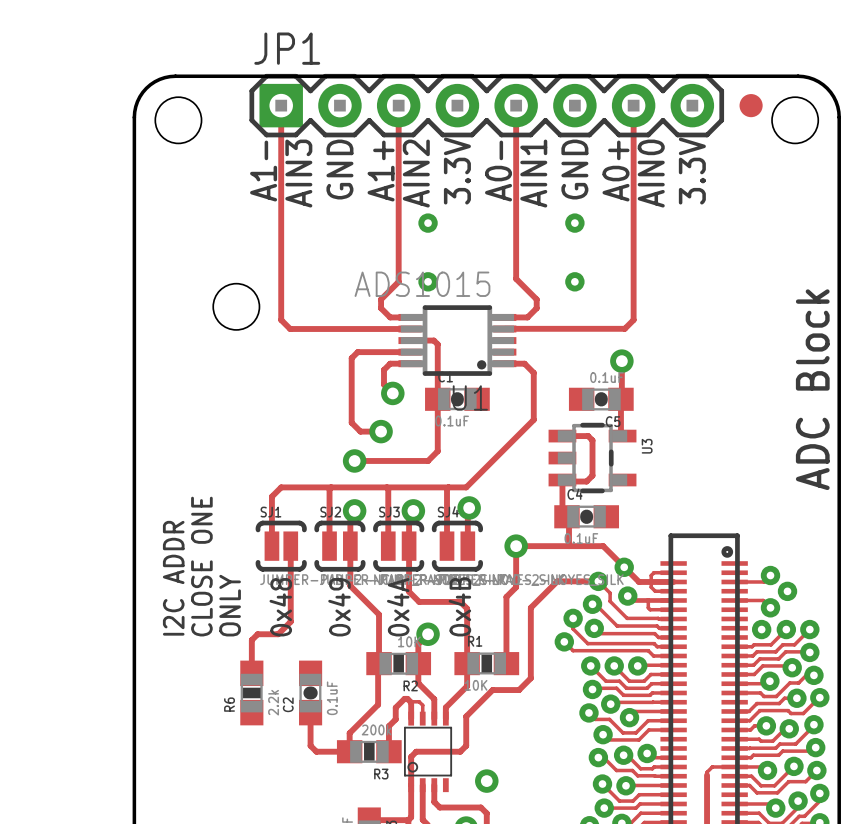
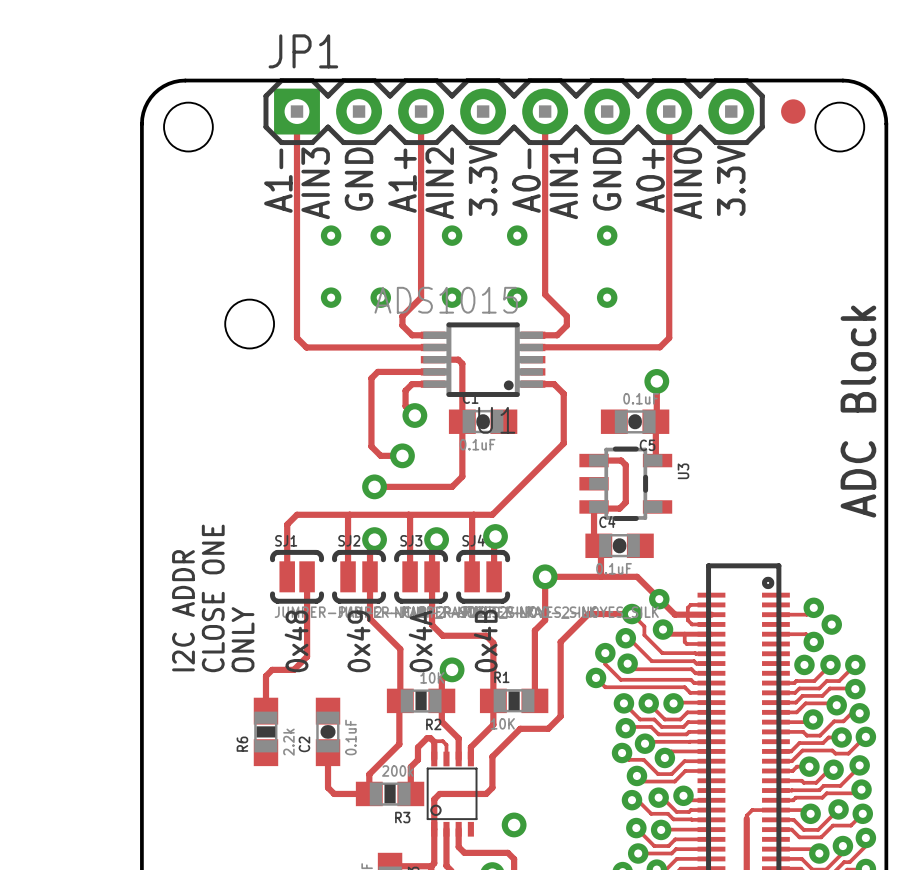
via: none -> (331, 235)
via: none -> (380, 235)
via: none -> (517, 235)
via: none -> (331, 297)
via: none -> (380, 297)
via: none -> (517, 297)

